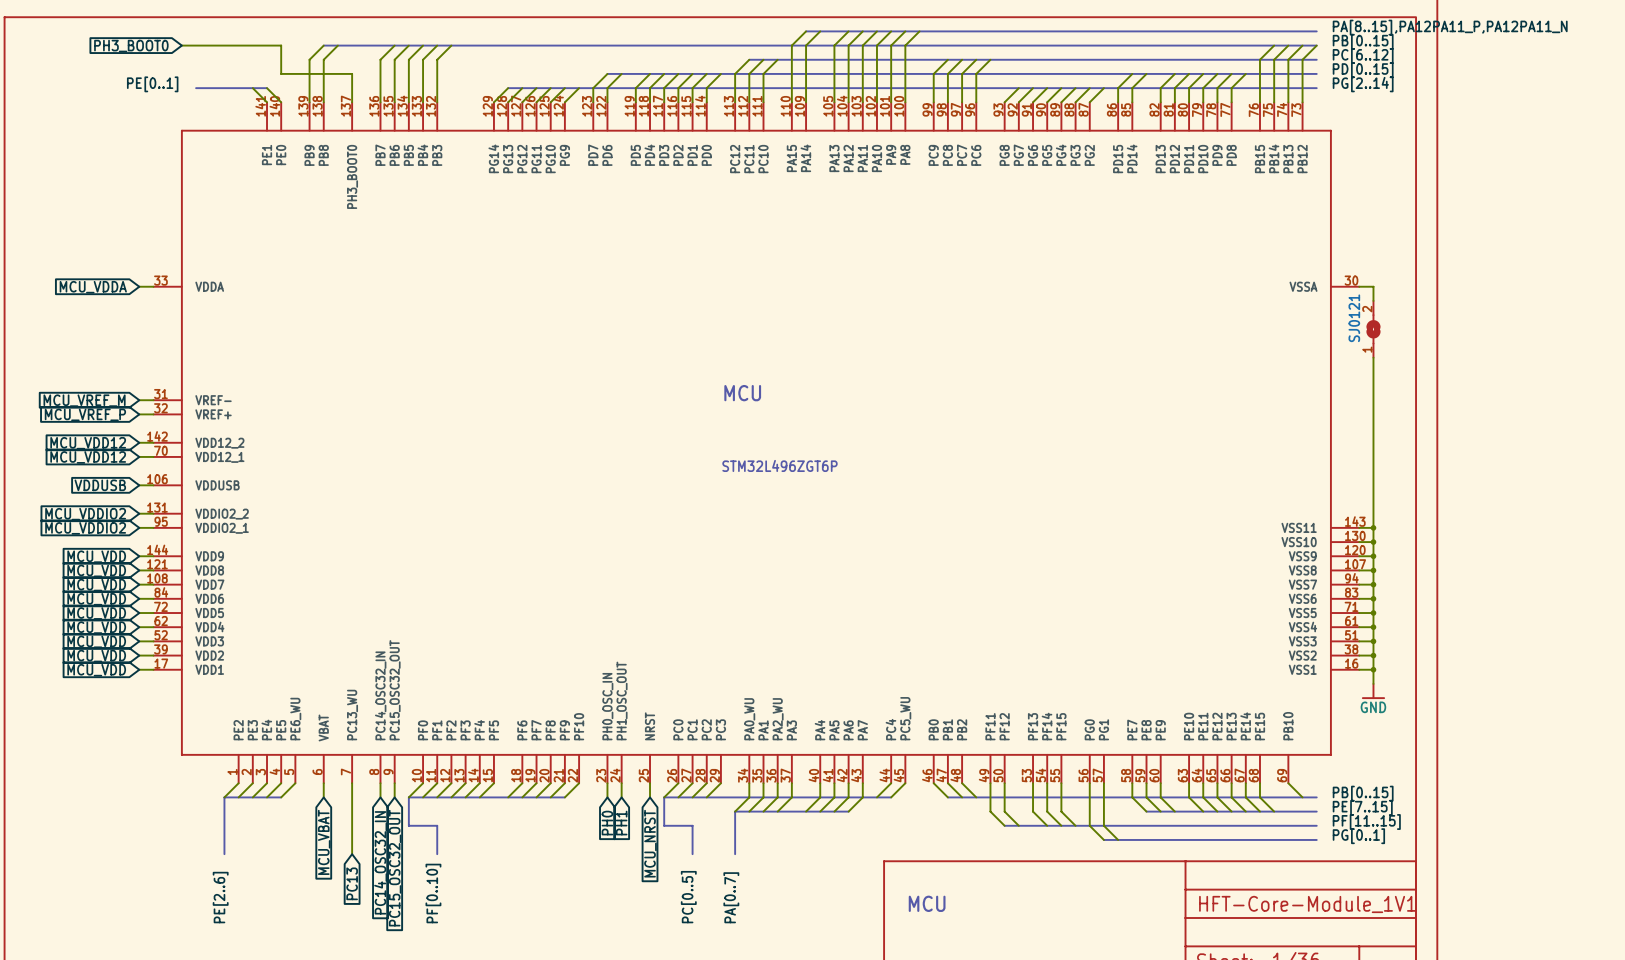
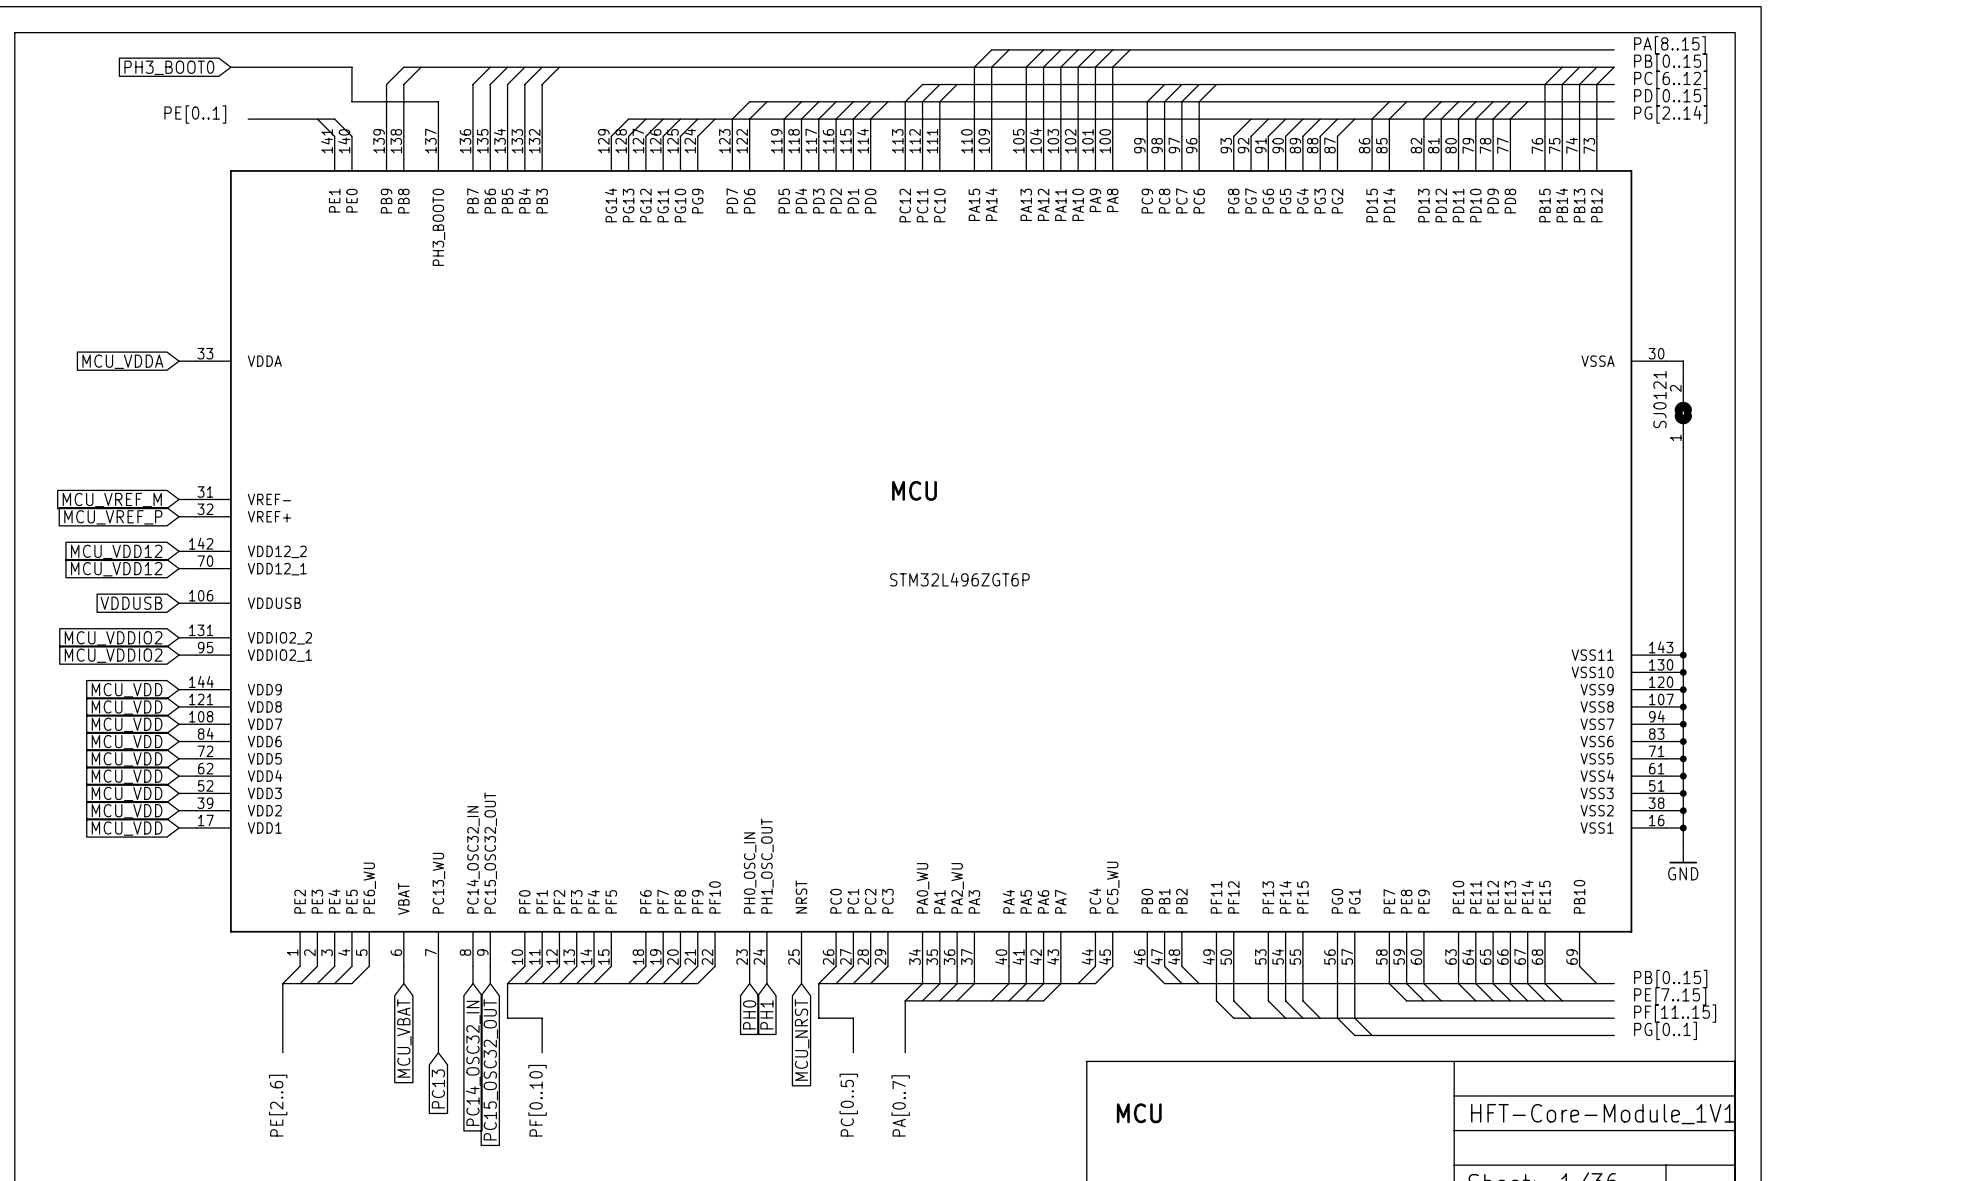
label: PA[8..15],PA12PA11_P,PA12PA11_N (1450, 27) -> PA[8..15] (1669, 45)

